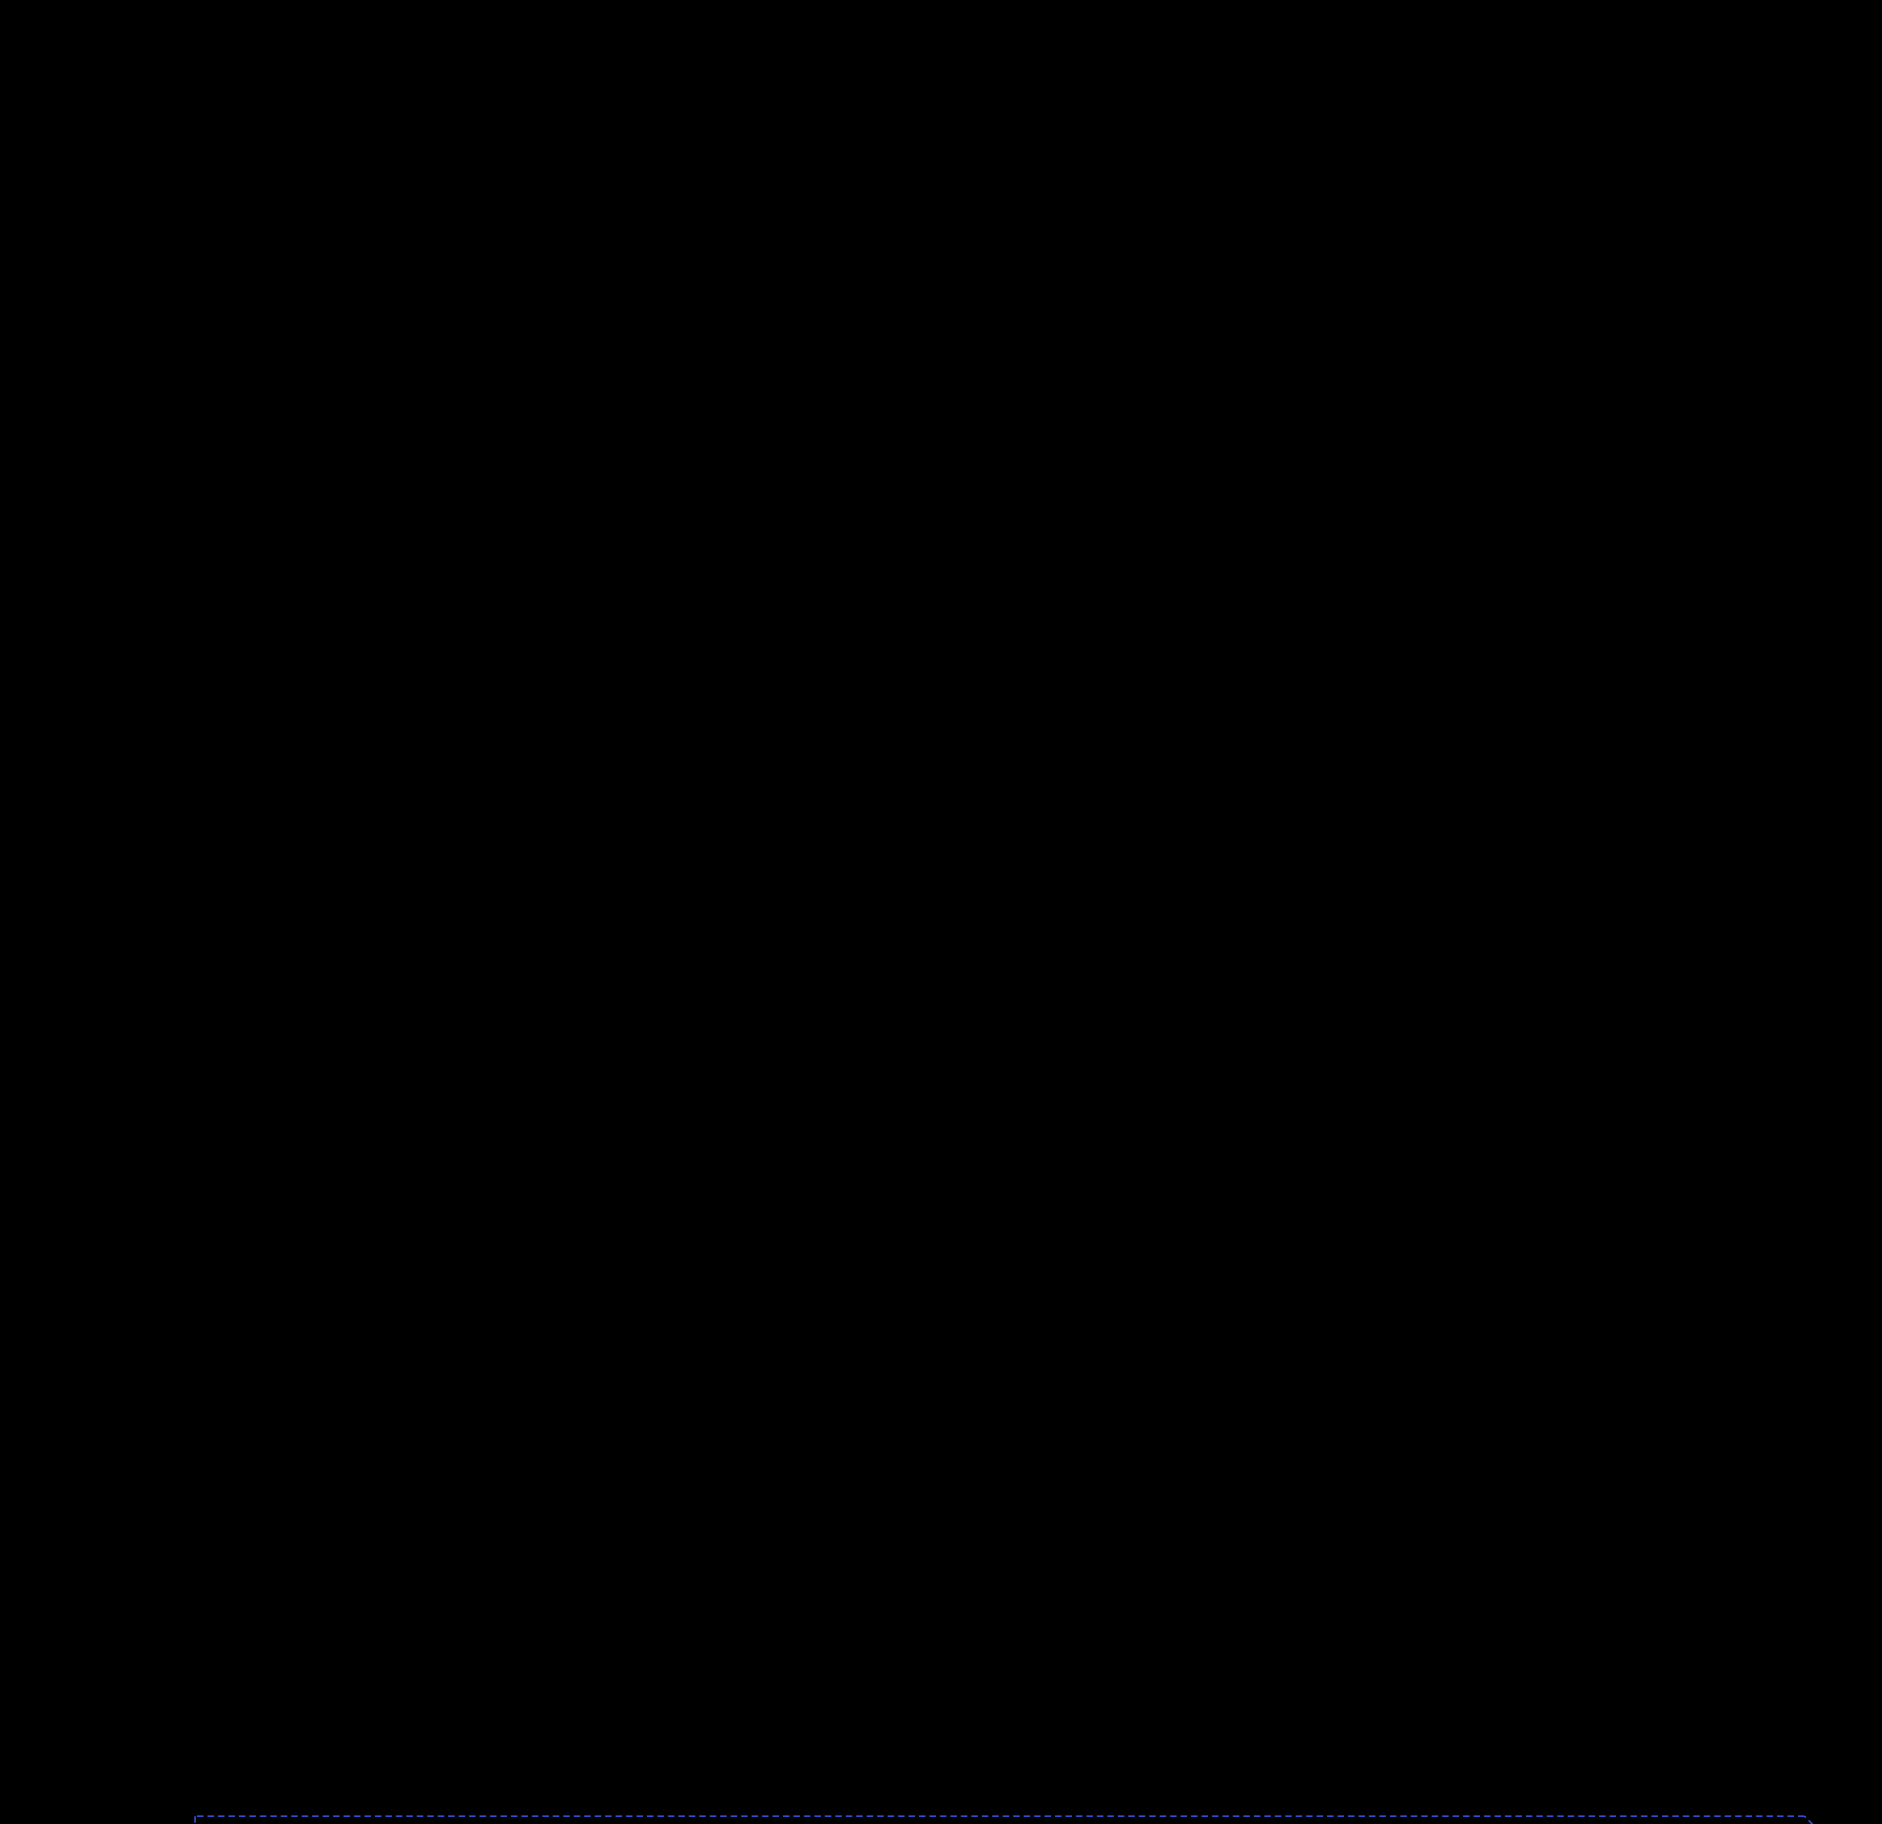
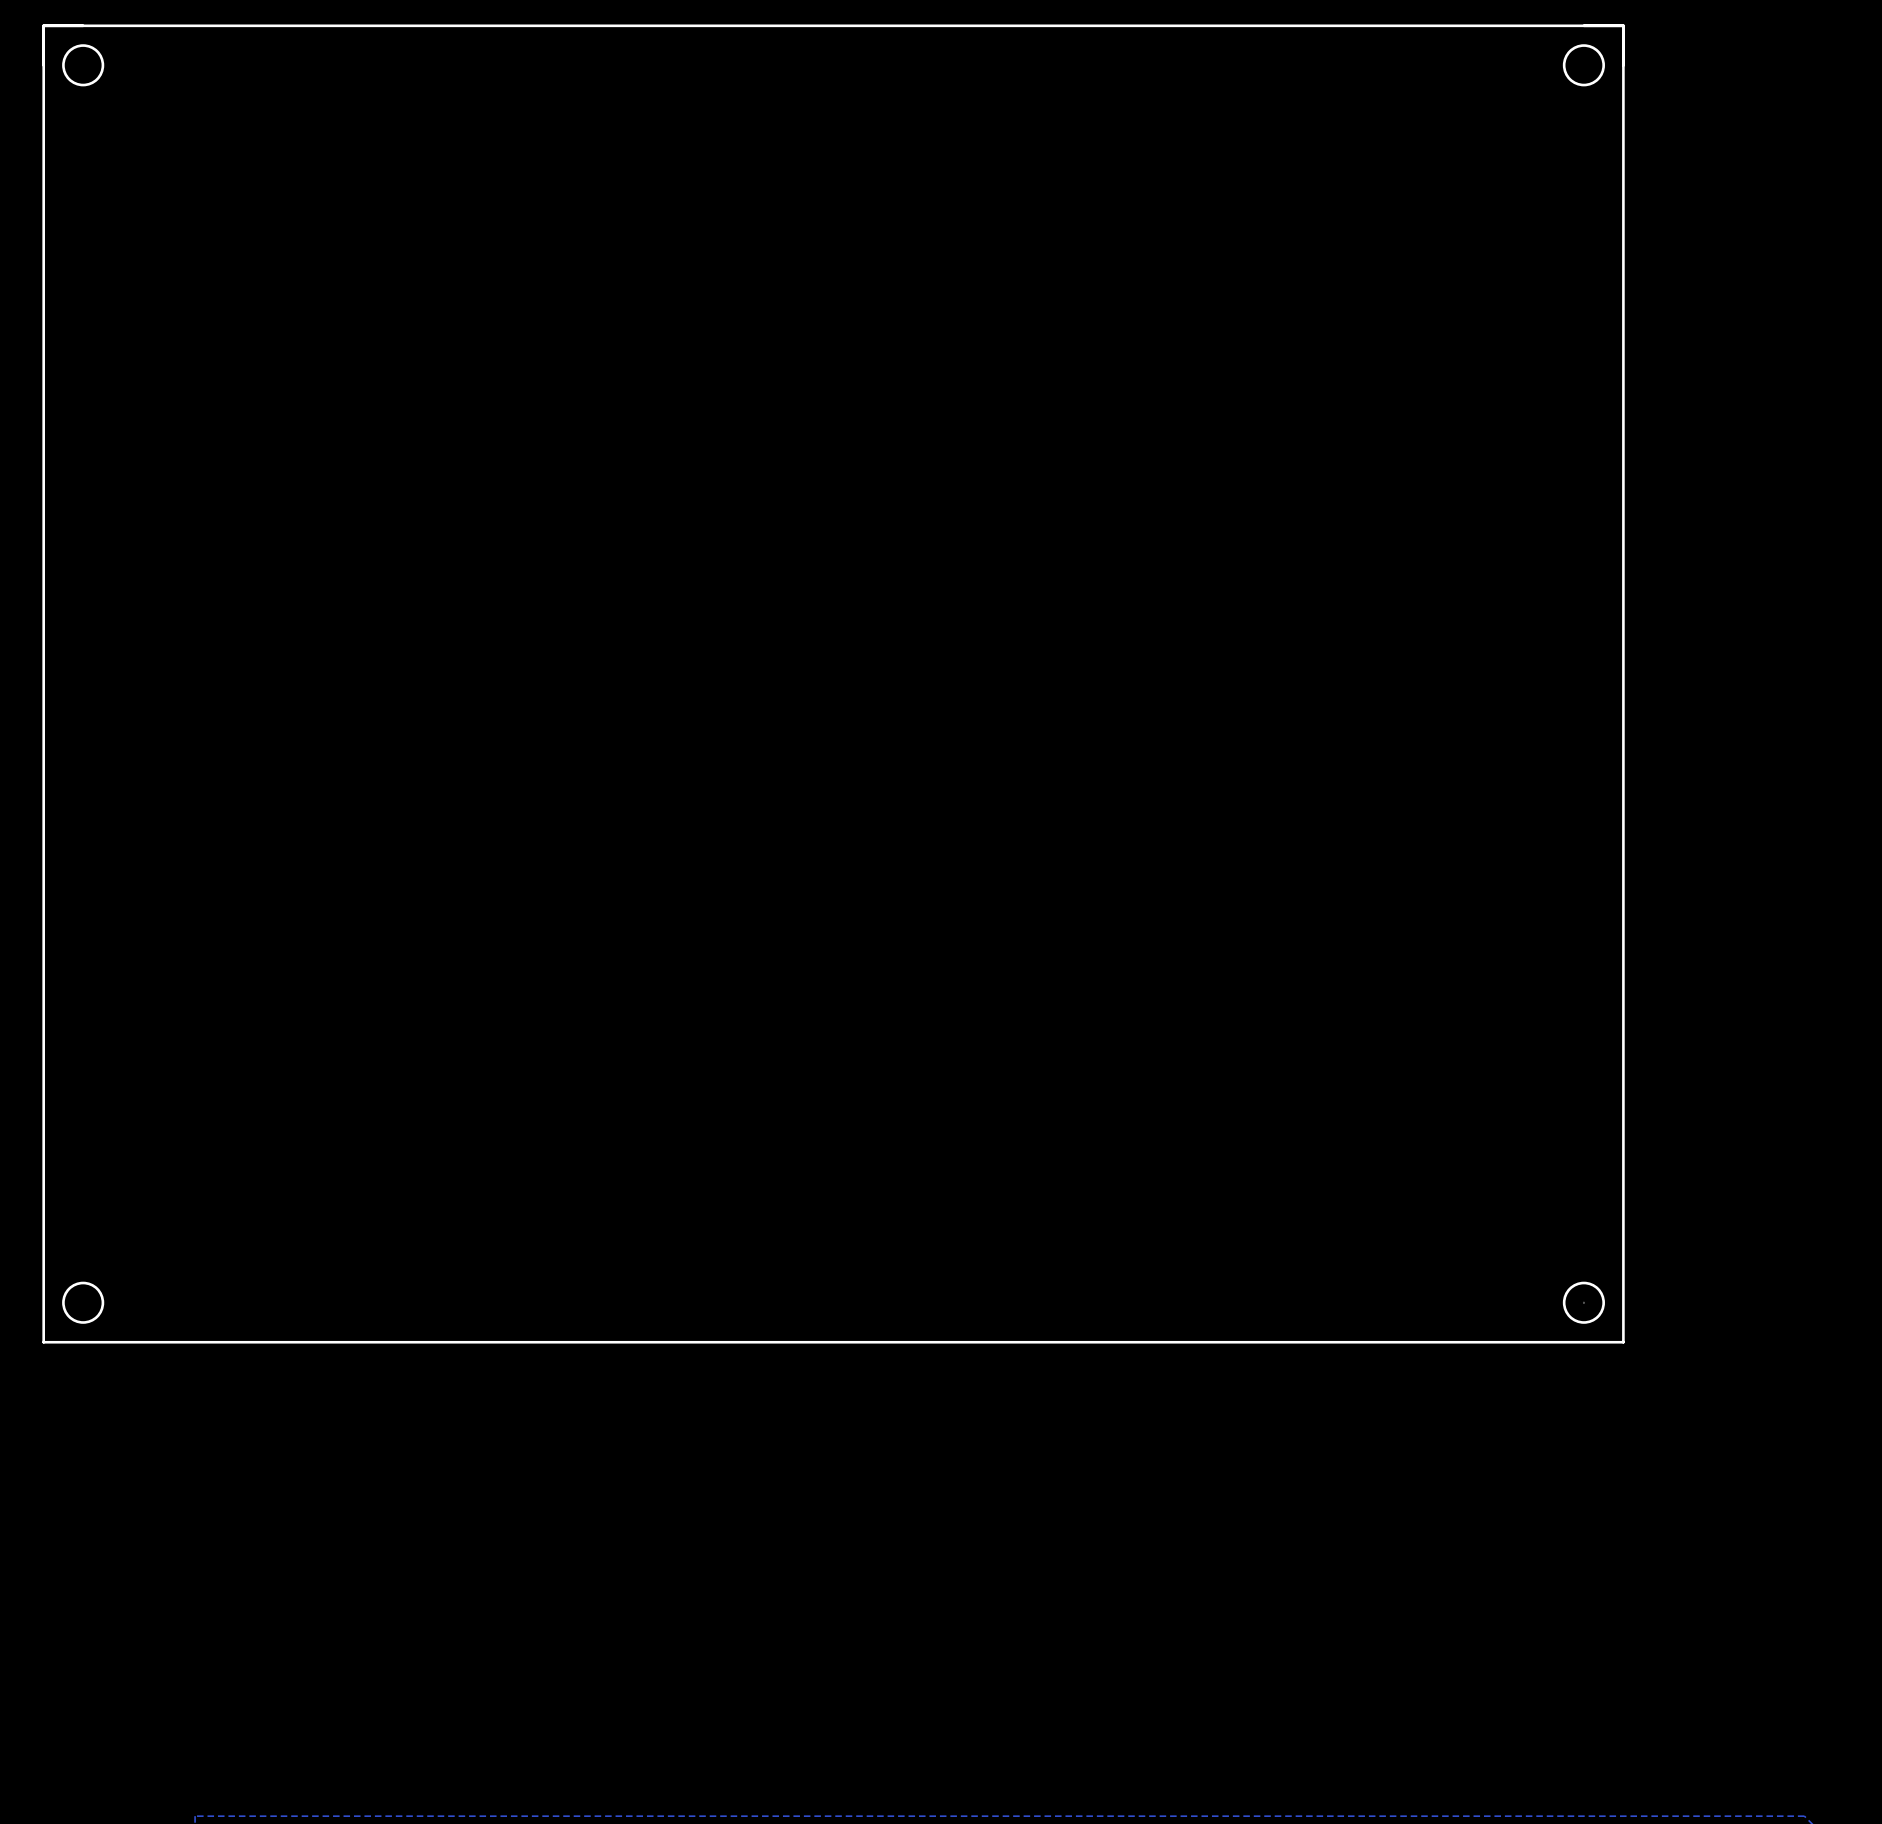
board edge: none -> (1623, 25) (43, 25) (43, 1342) (1623, 1342) (1623, 25)
round board edge: none -> [62, 44, 105, 87]
round board edge: none -> [1562, 44, 1605, 87]
round board edge: none -> [62, 1281, 105, 1324]
round board edge: none -> [1562, 1281, 1605, 1324]

